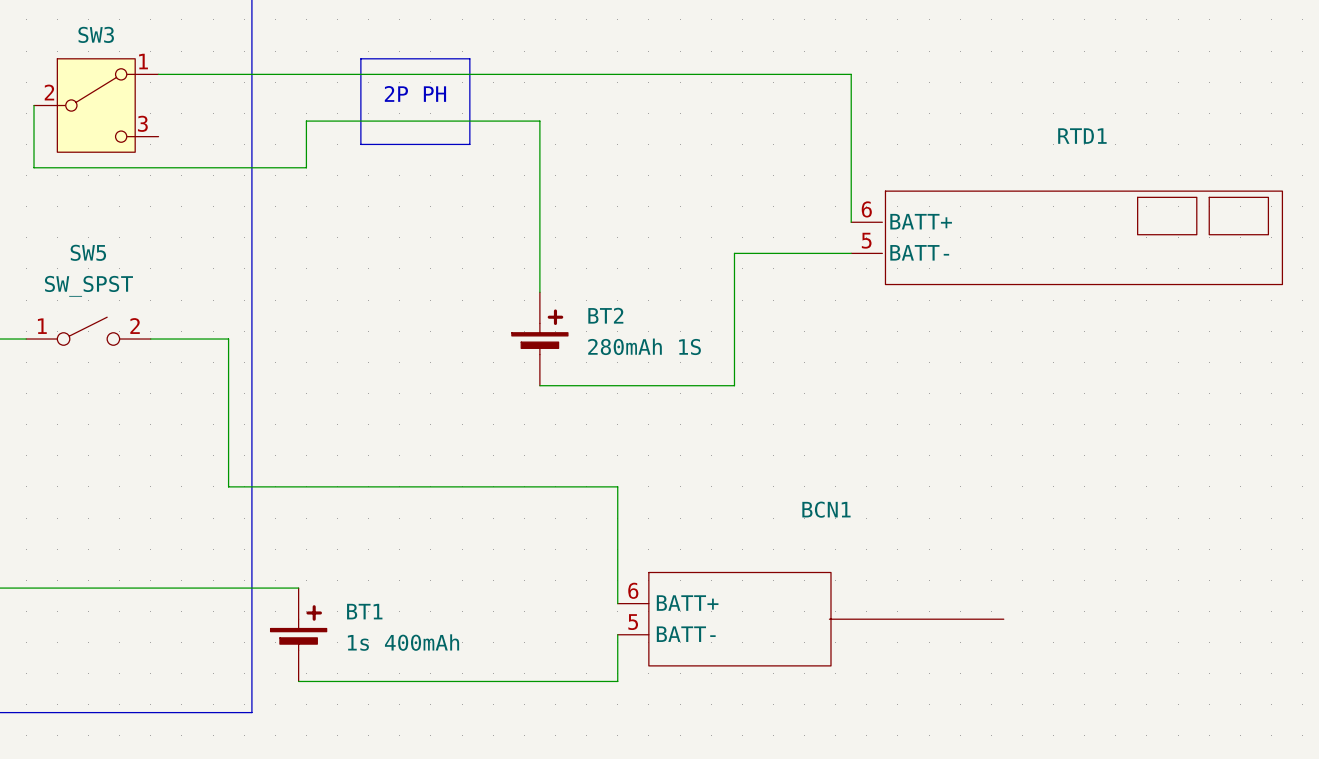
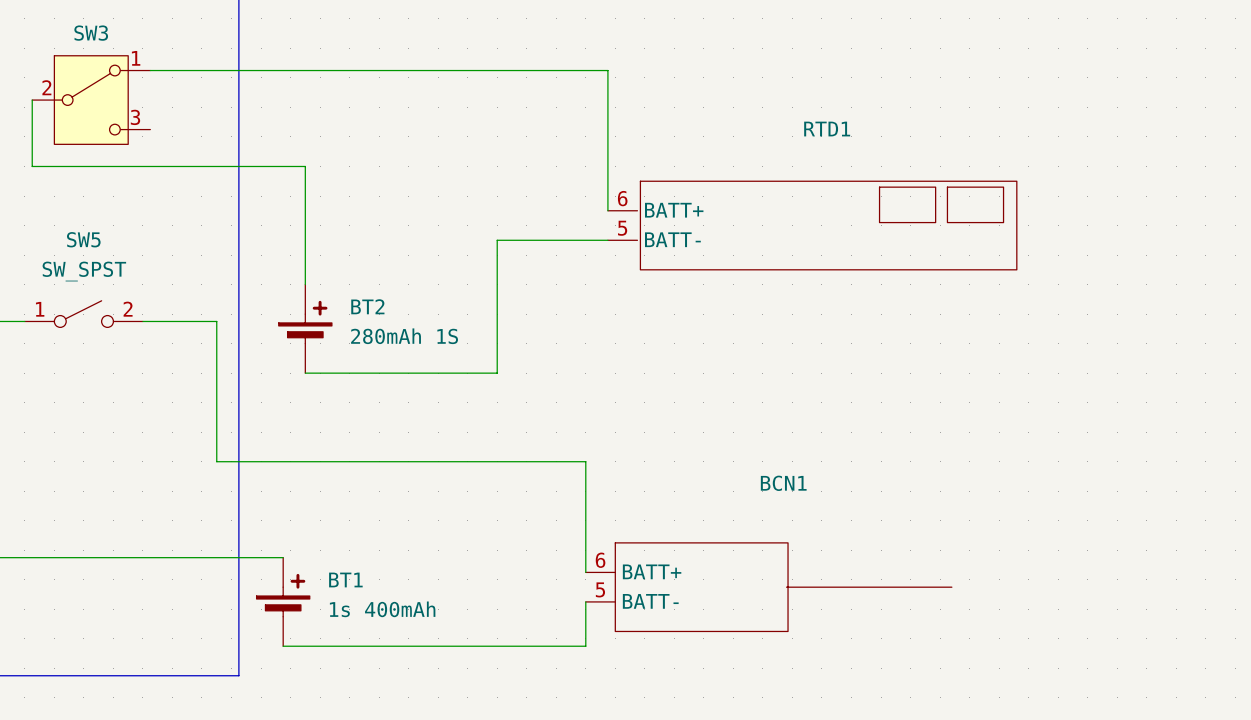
line: (360, 58) (469, 58) (469, 144) (360, 144) (360, 58) -> none
wire: (641, 74) (851, 74) (851, 222) -> (607, 70) (607, 210)
text: 2P PH (415, 93) -> none
wire: (34, 167) (306, 167) (306, 121) (539, 121) (539, 292) -> (32, 159) (32, 166) (305, 166) (305, 284)
RTD1 position: (1066, 237) -> (812, 225)
wire: none -> (607, 240) (497, 240) (497, 373) (305, 373)
wire: (851, 253) (734, 253) (734, 385) (539, 385) -> none
BT2 position: (539, 339) -> (305, 328)

